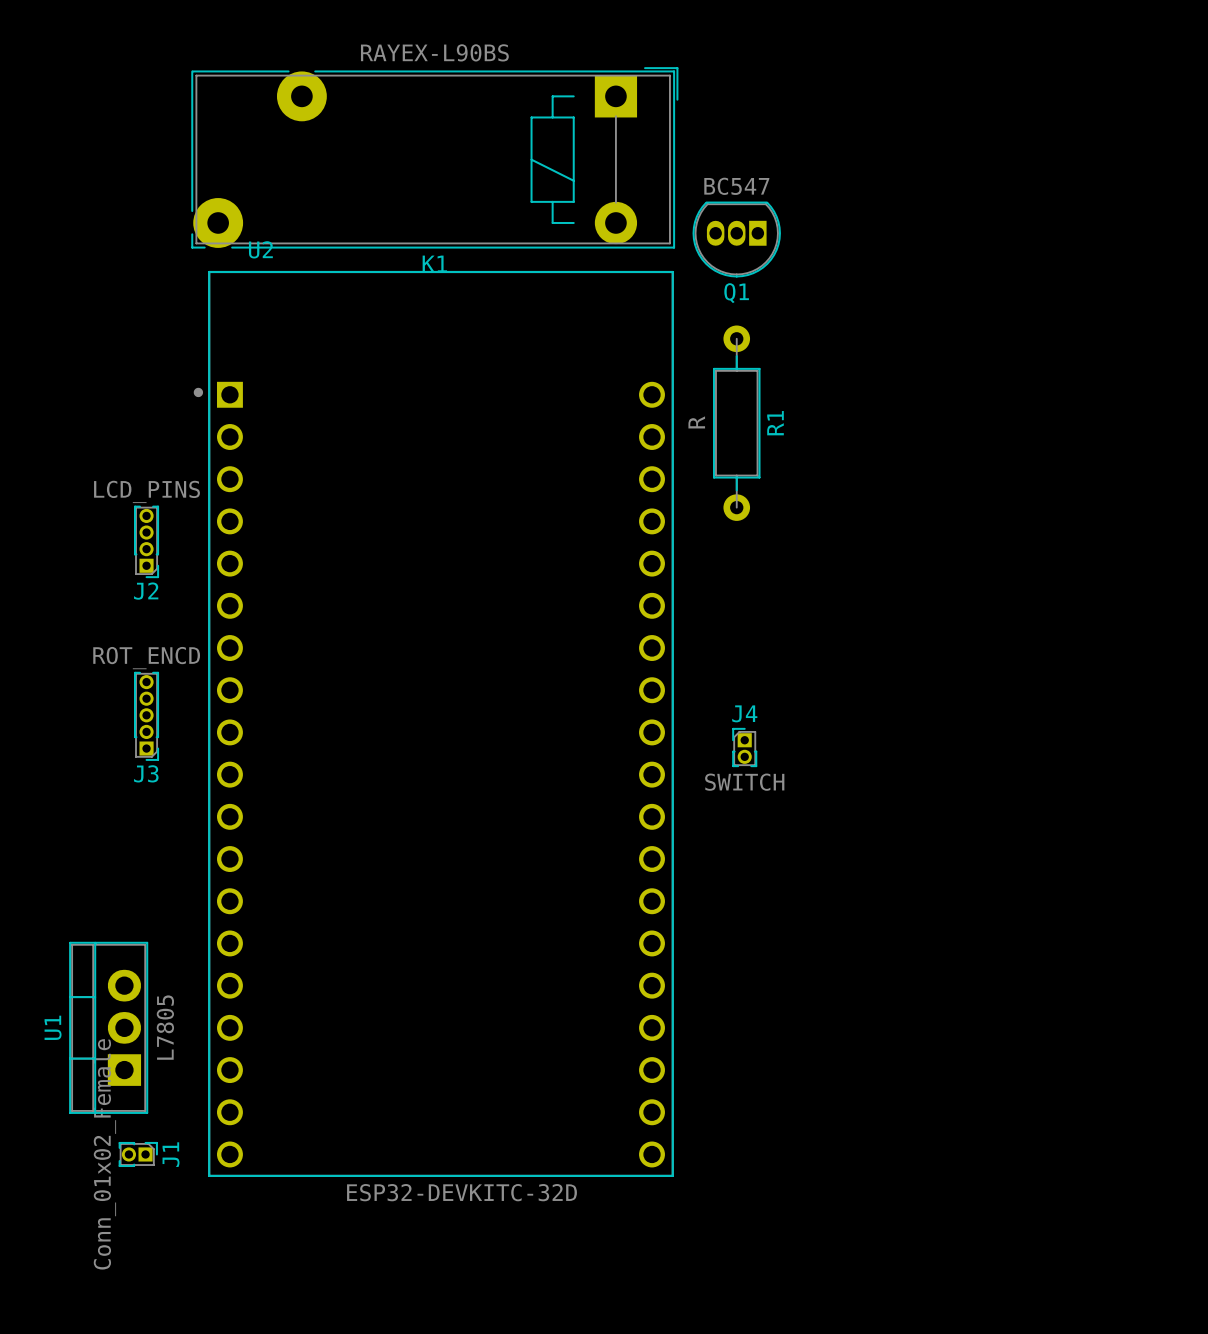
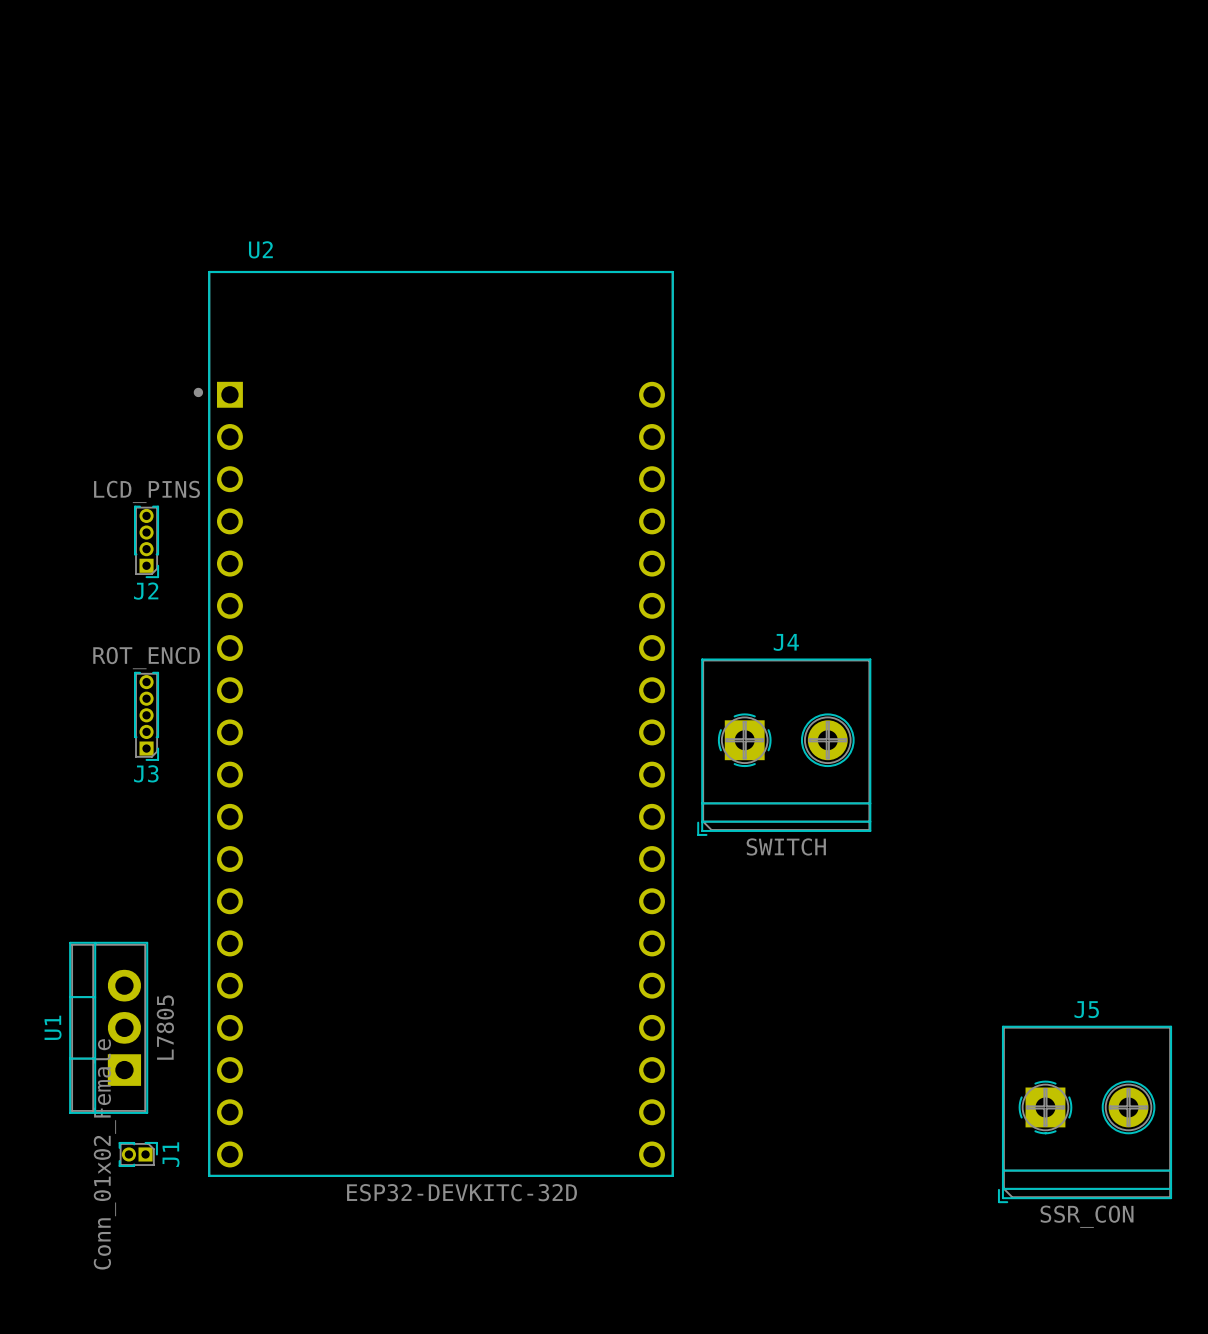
K1: RAYEX-L90BS (434, 157) -> none
Q1: BC547 (736, 239) -> none
R1: R (736, 423) -> none
J4 name position: J4 (744, 713) -> J4 (786, 642)
J4 footprint: [732, 727, 758, 768] -> [697, 658, 872, 836]
J4 value position: SWITCH (744, 782) -> SWITCH (786, 846)
J5: none -> SSR_CON (1085, 1114)

